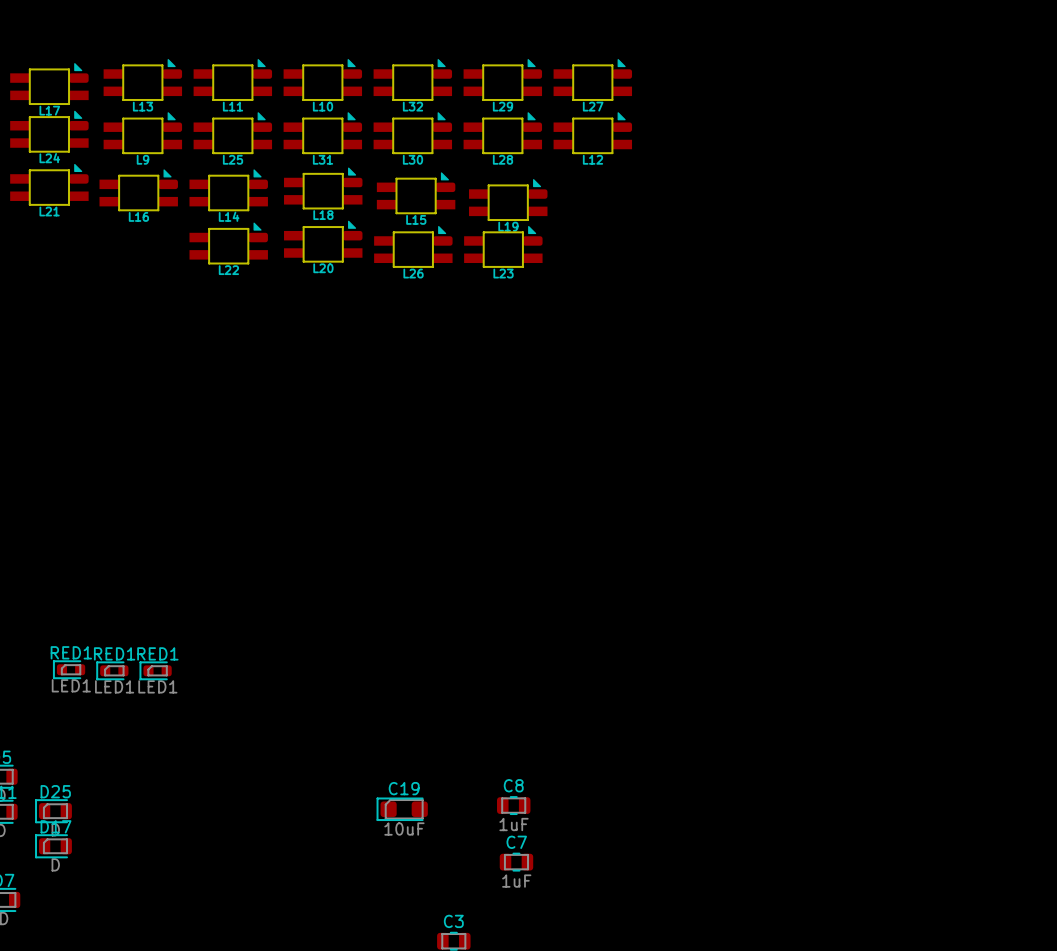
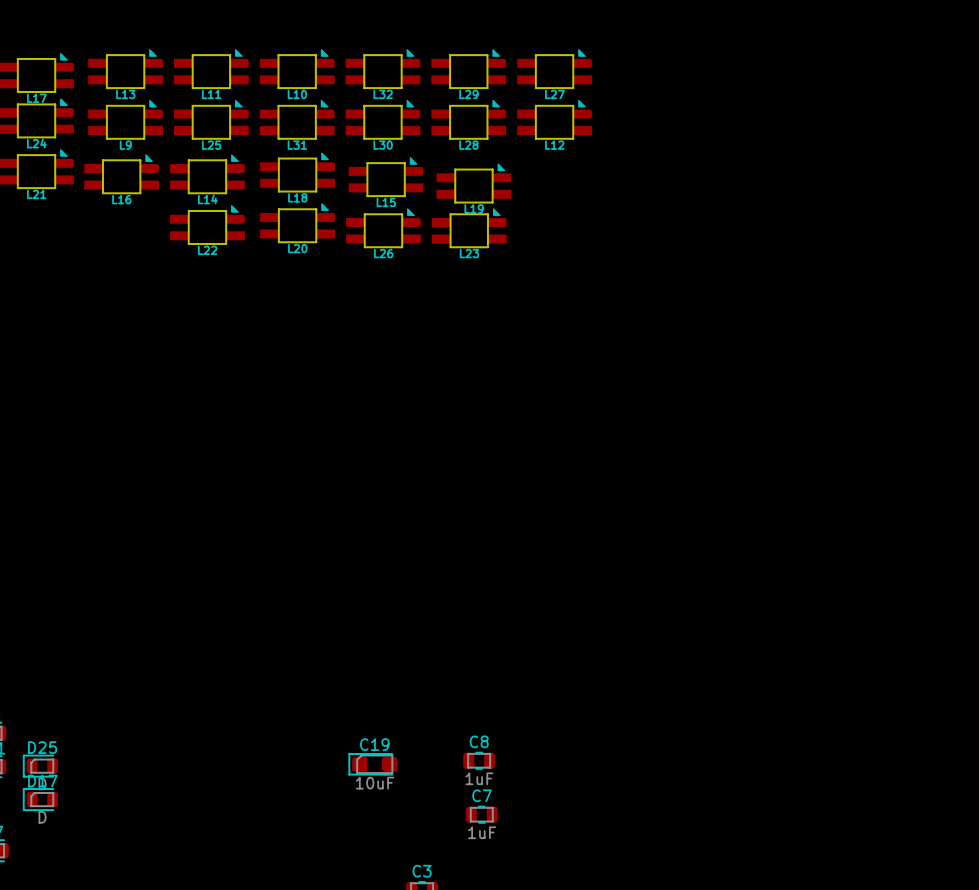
RED1: LED1 (69, 669) -> none
RED1: LED1 (112, 670) -> none
RED1: LED1 (155, 670) -> none

